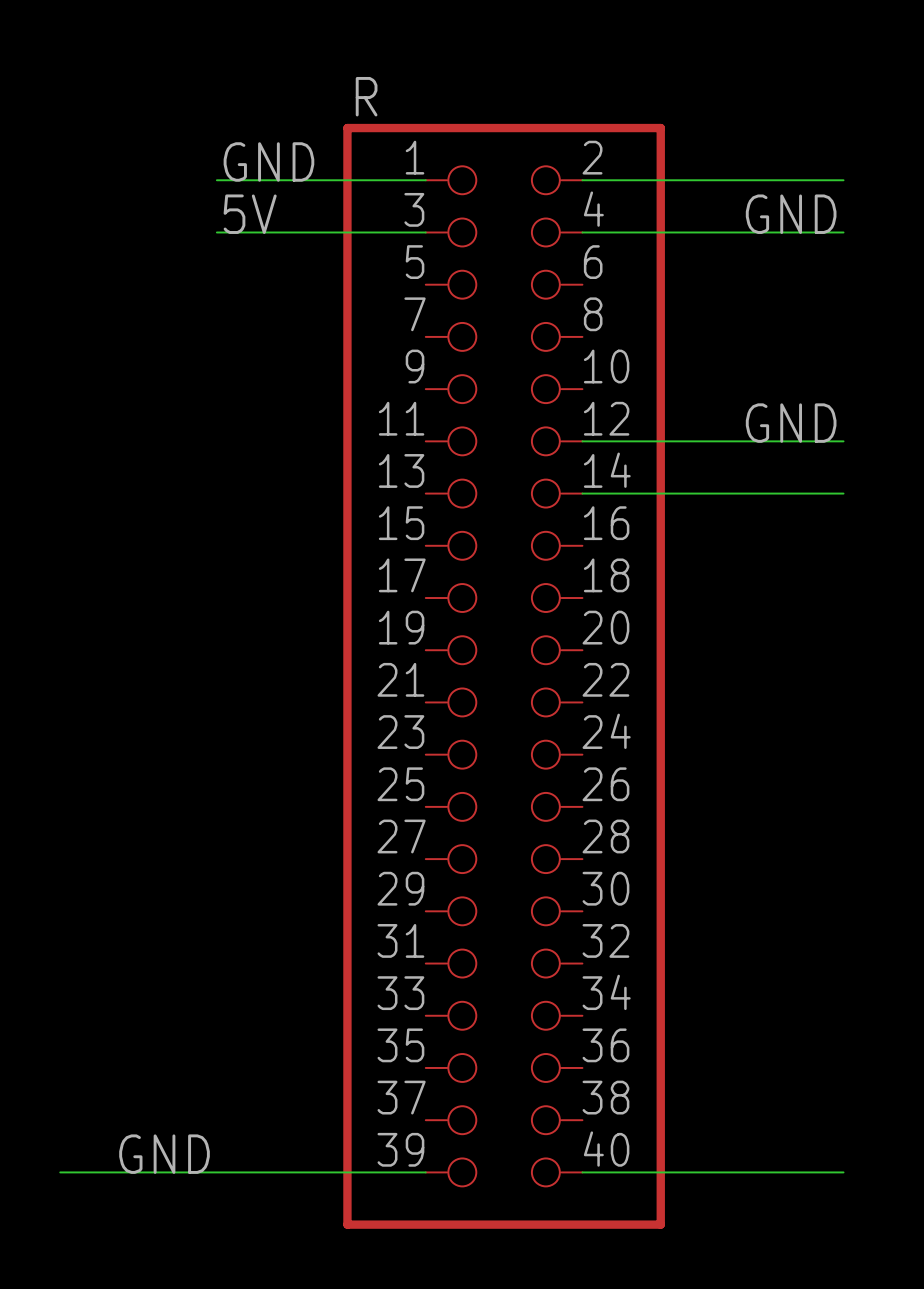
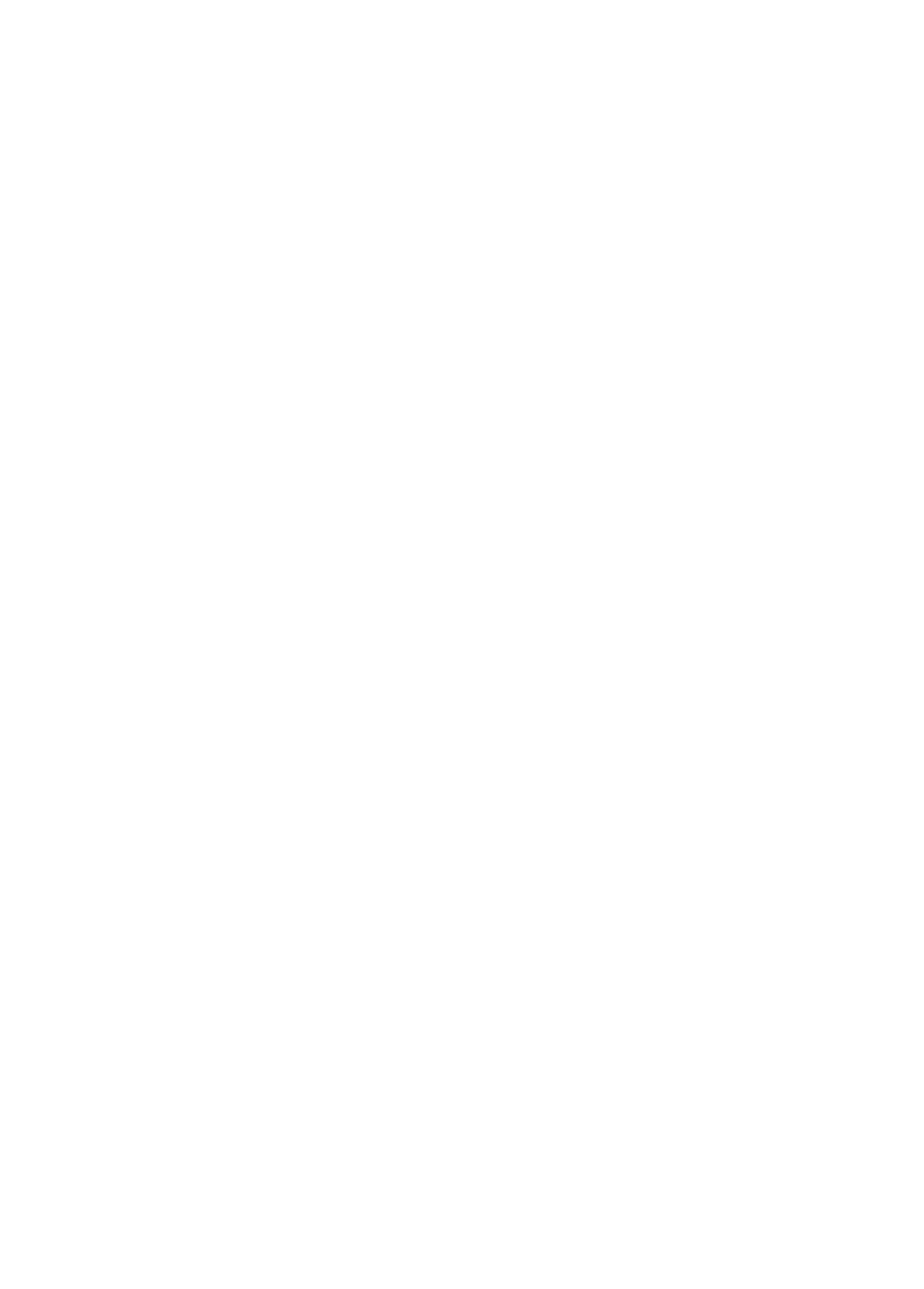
label: GND (268, 161) -> none
wire: (216, 180) (425, 180) -> none
wire: (582, 180) (843, 180) -> none
label: 5V (250, 214) -> none
label: GND (791, 214) -> none
wire: (216, 232) (425, 232) -> none
wire: (582, 232) (843, 232) -> none
label: GND (791, 423) -> none
wire: (582, 441) (843, 441) -> none
wire: (582, 493) (843, 493) -> none
R: (504, 676) -> none
label: GND (164, 1154) -> none
wire: (60, 1172) (425, 1172) -> none
wire: (582, 1172) (843, 1172) -> none

